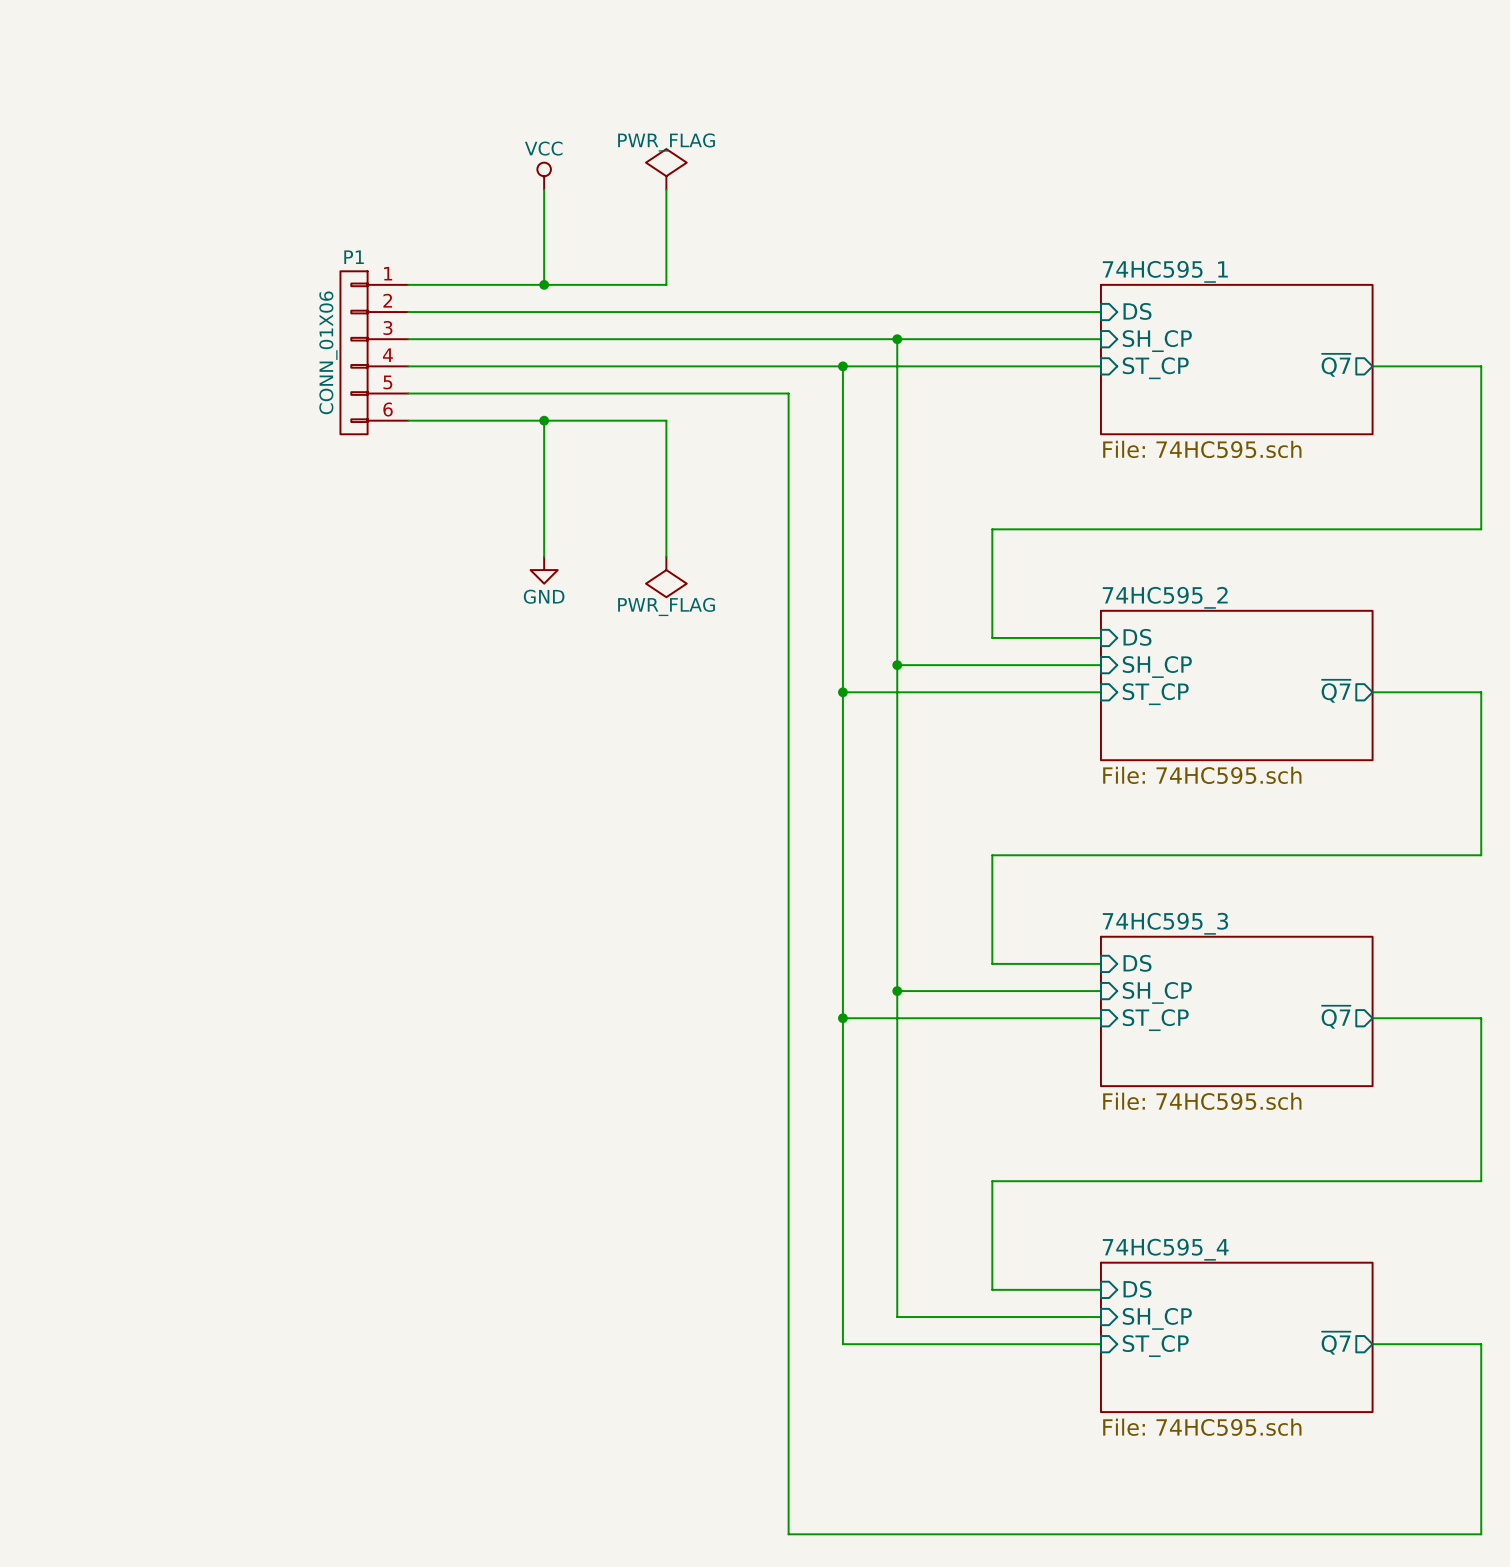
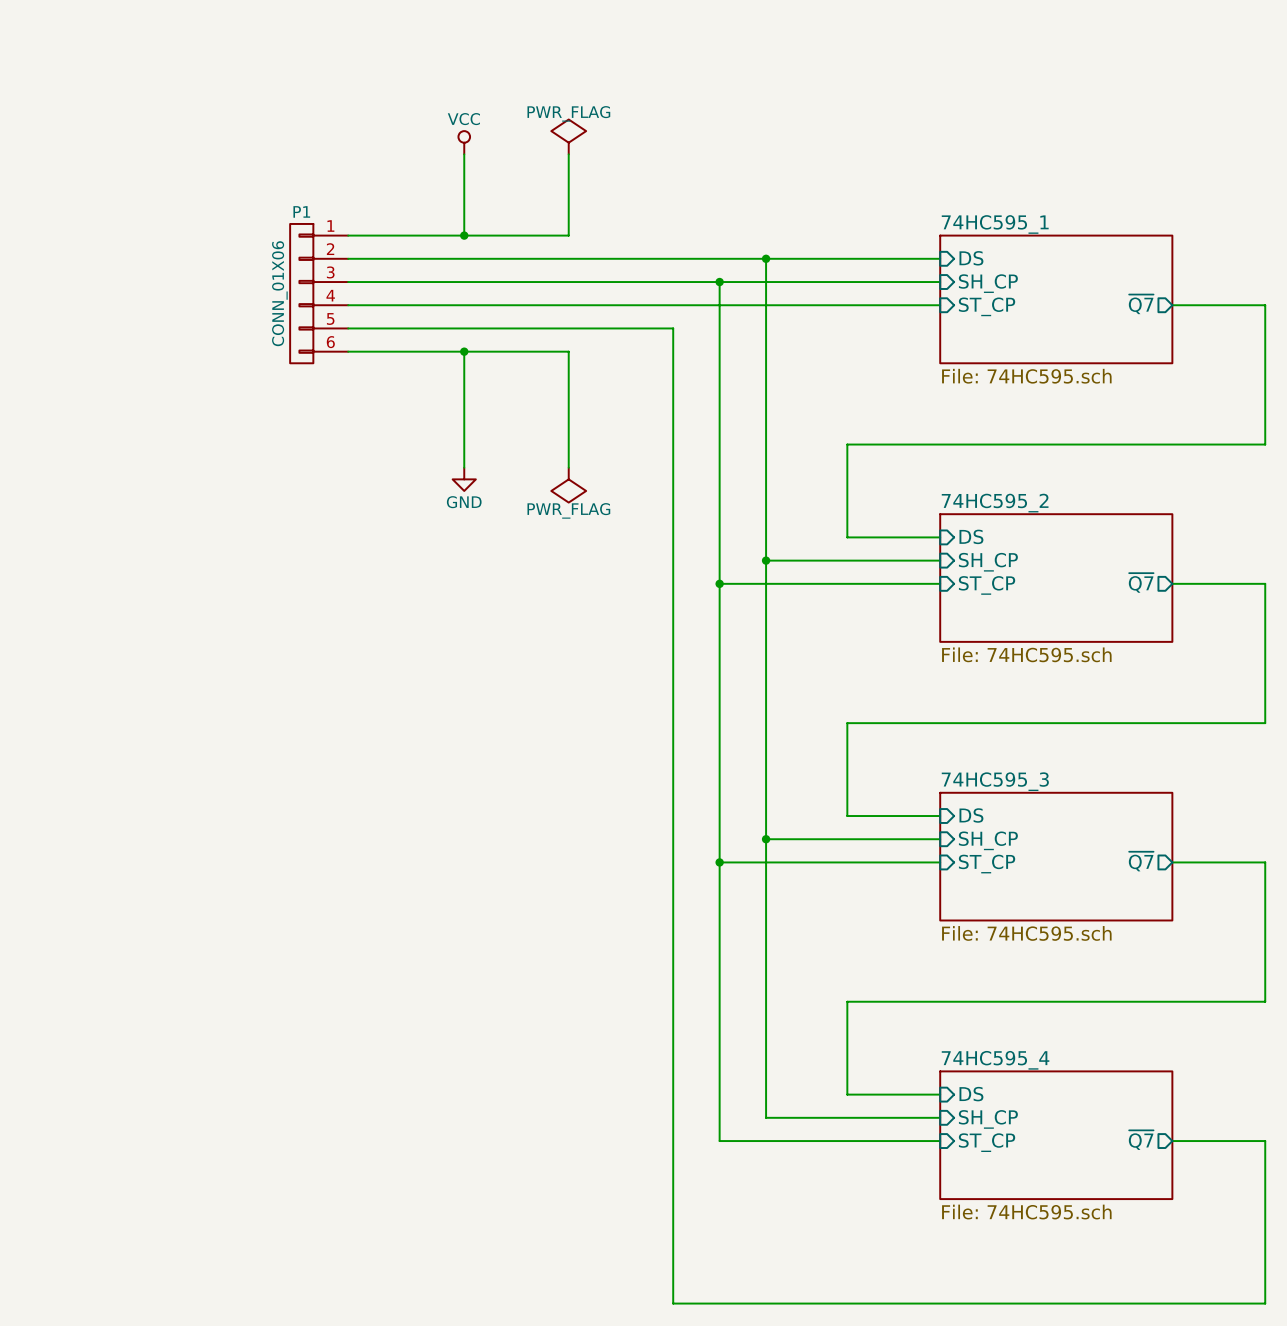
wire: none -> (766, 258) (766, 282)
junction: none -> (766, 258)
wire: none -> (719, 282) (719, 305)
junction: none -> (719, 282)
junction: (897, 339) -> none
junction: (842, 366) -> none

